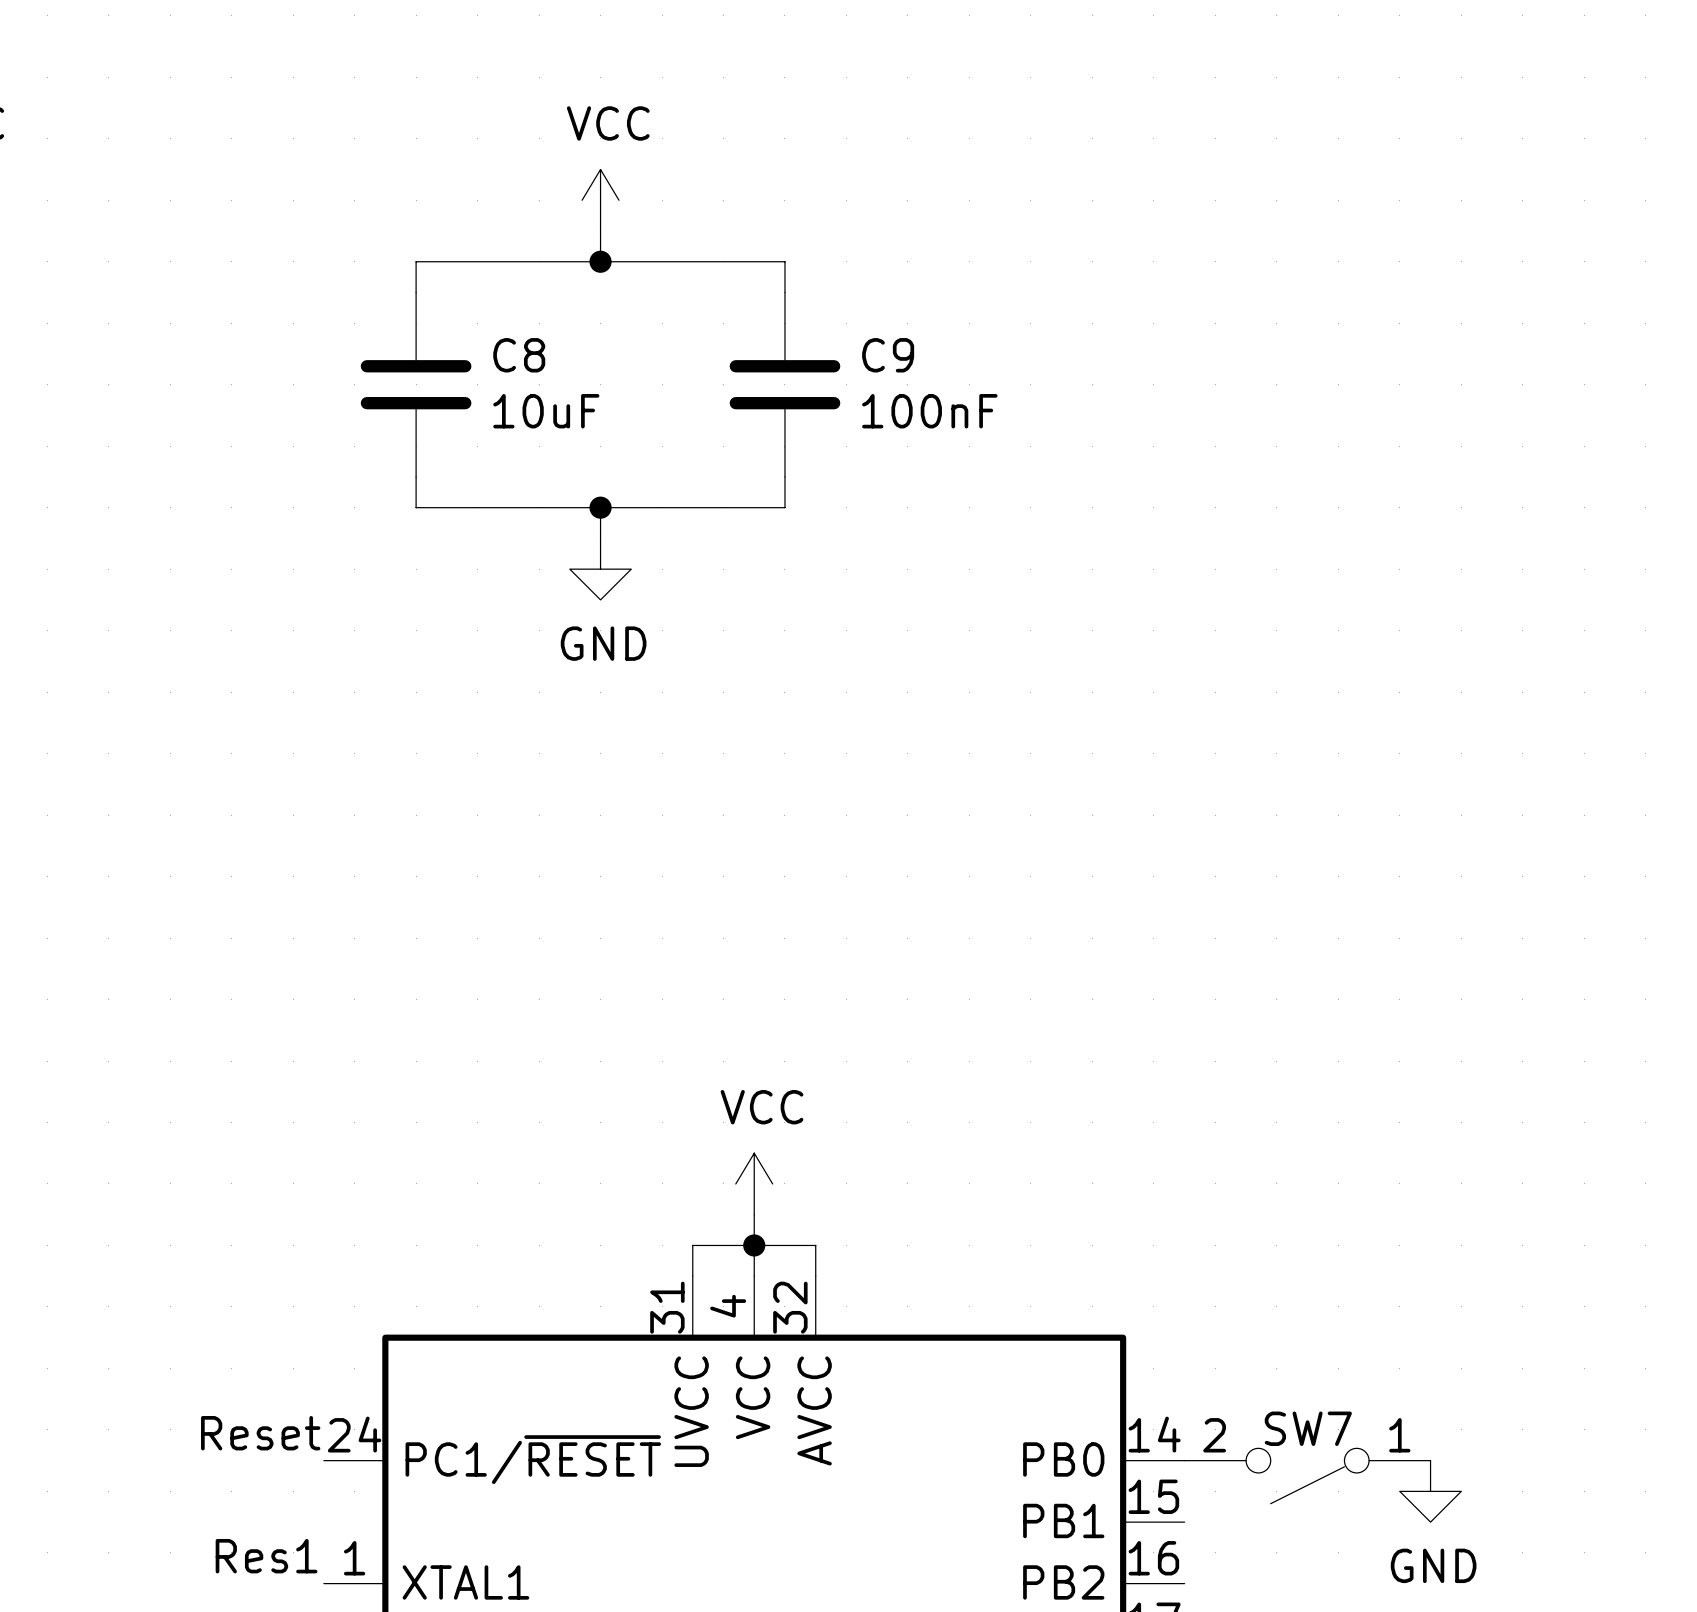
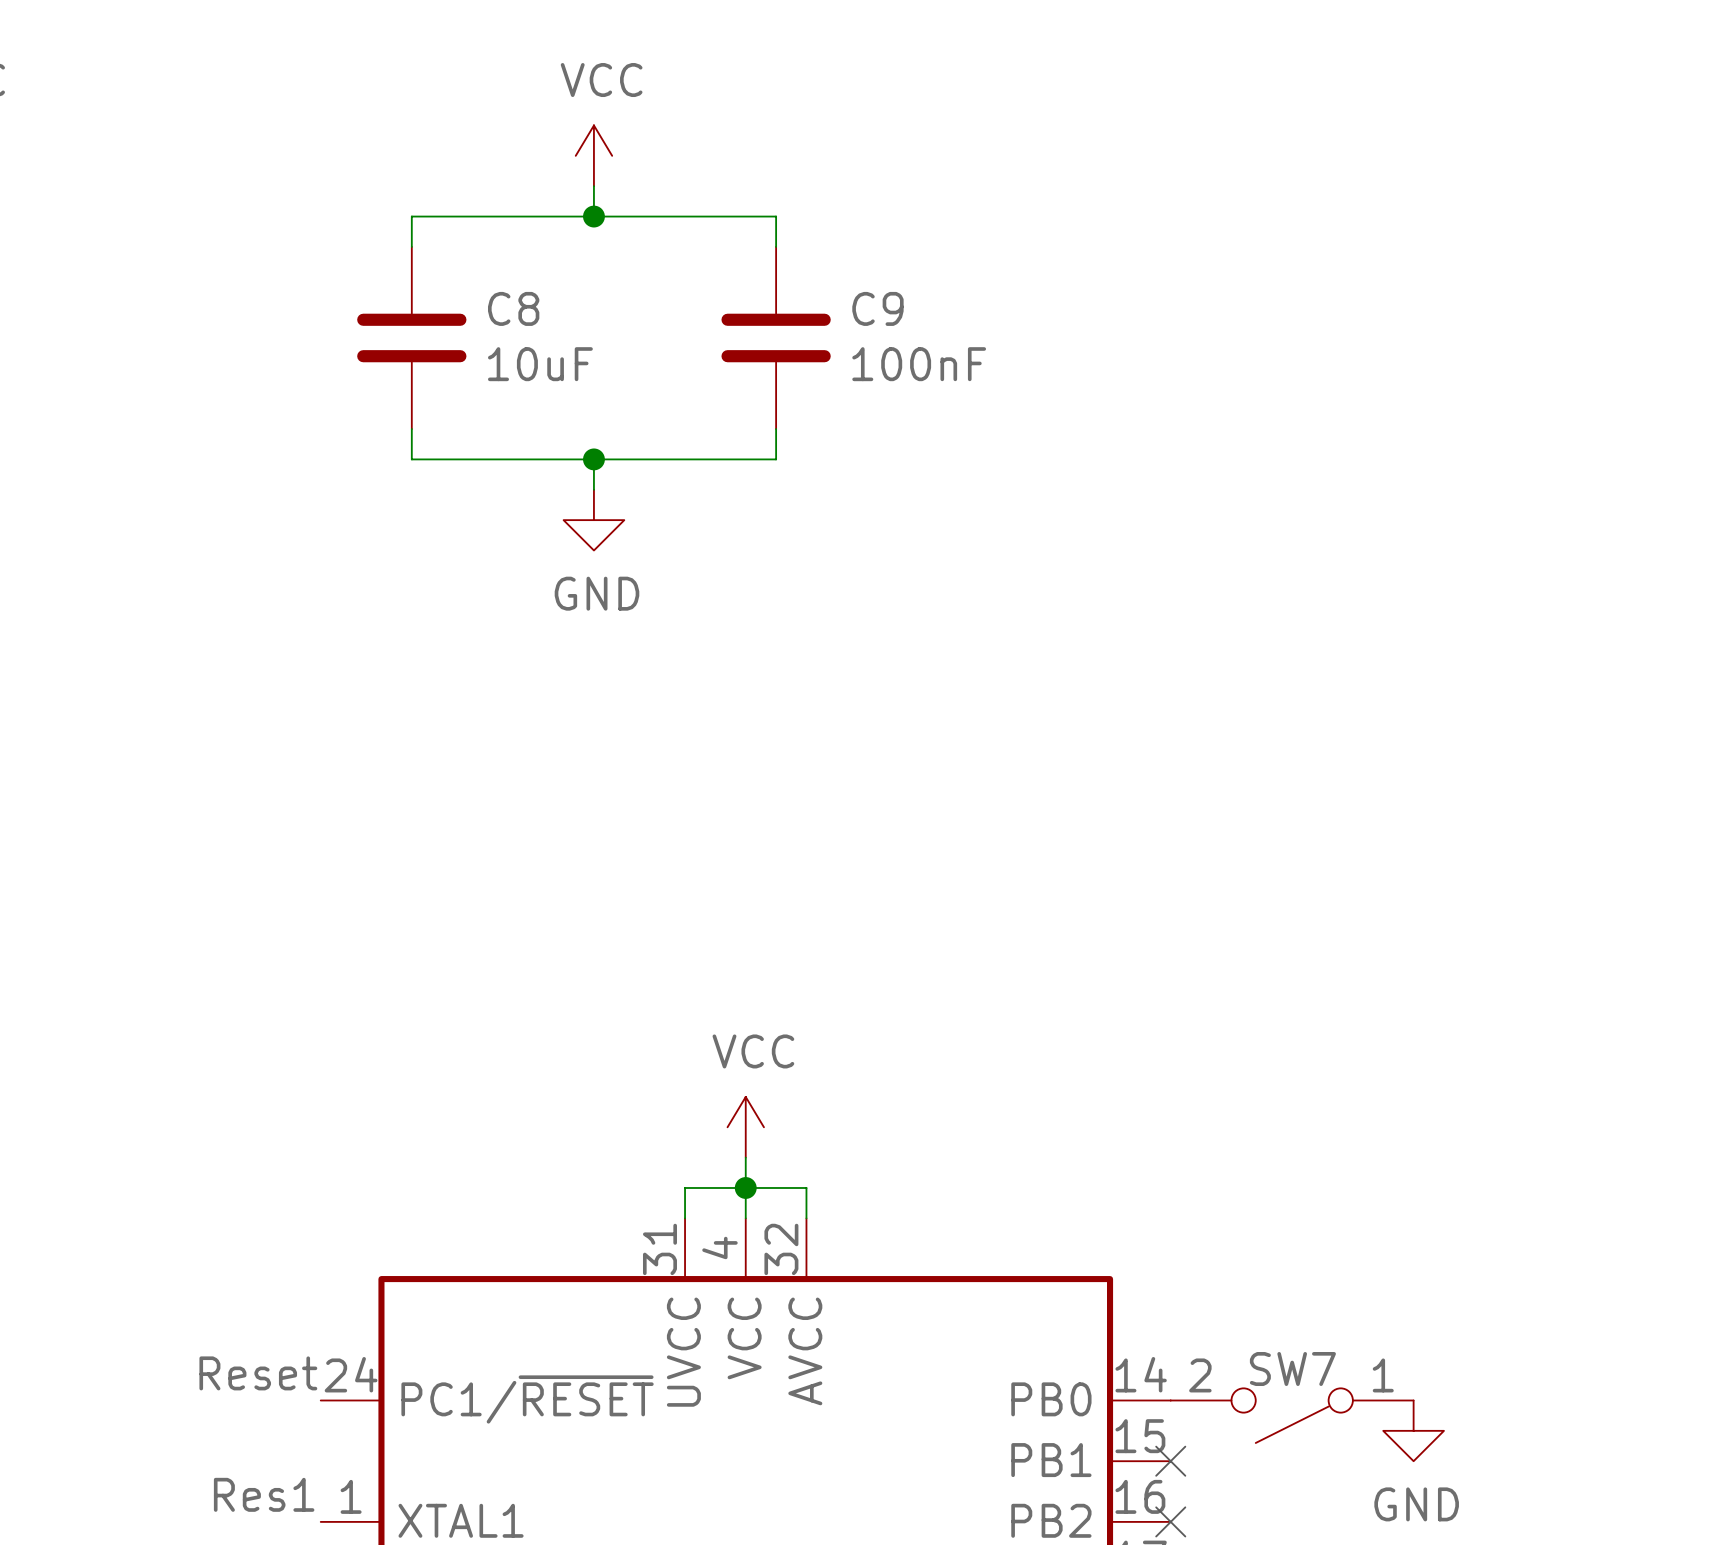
no-connect mark: none -> (1170, 1461)
no-connect mark: none -> (1170, 1521)

